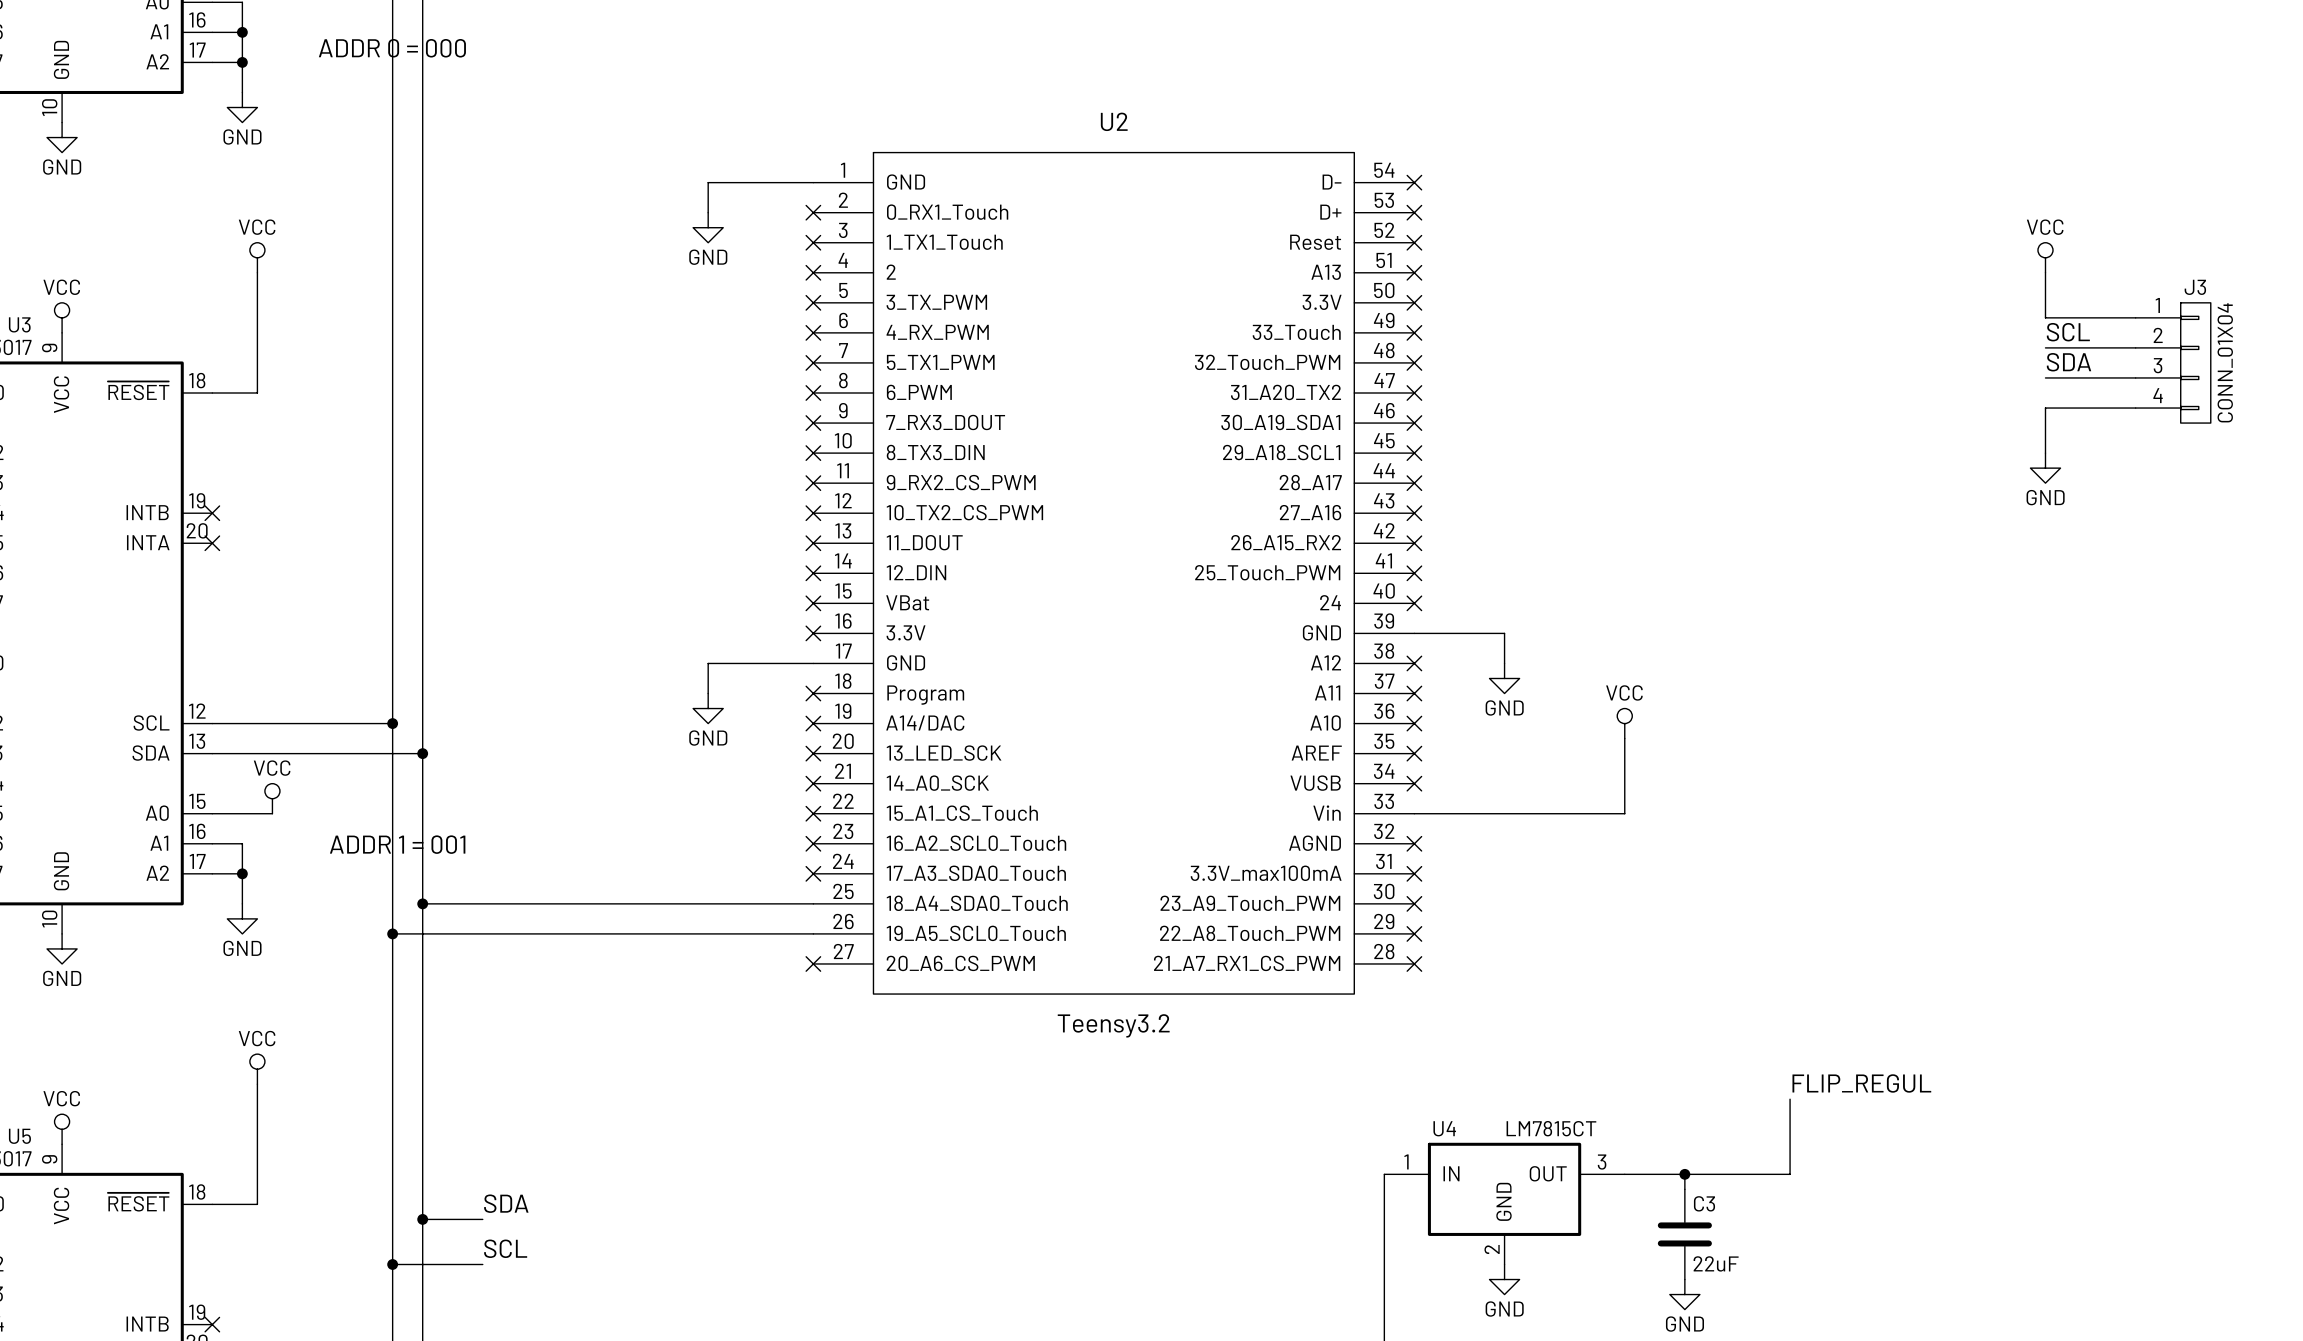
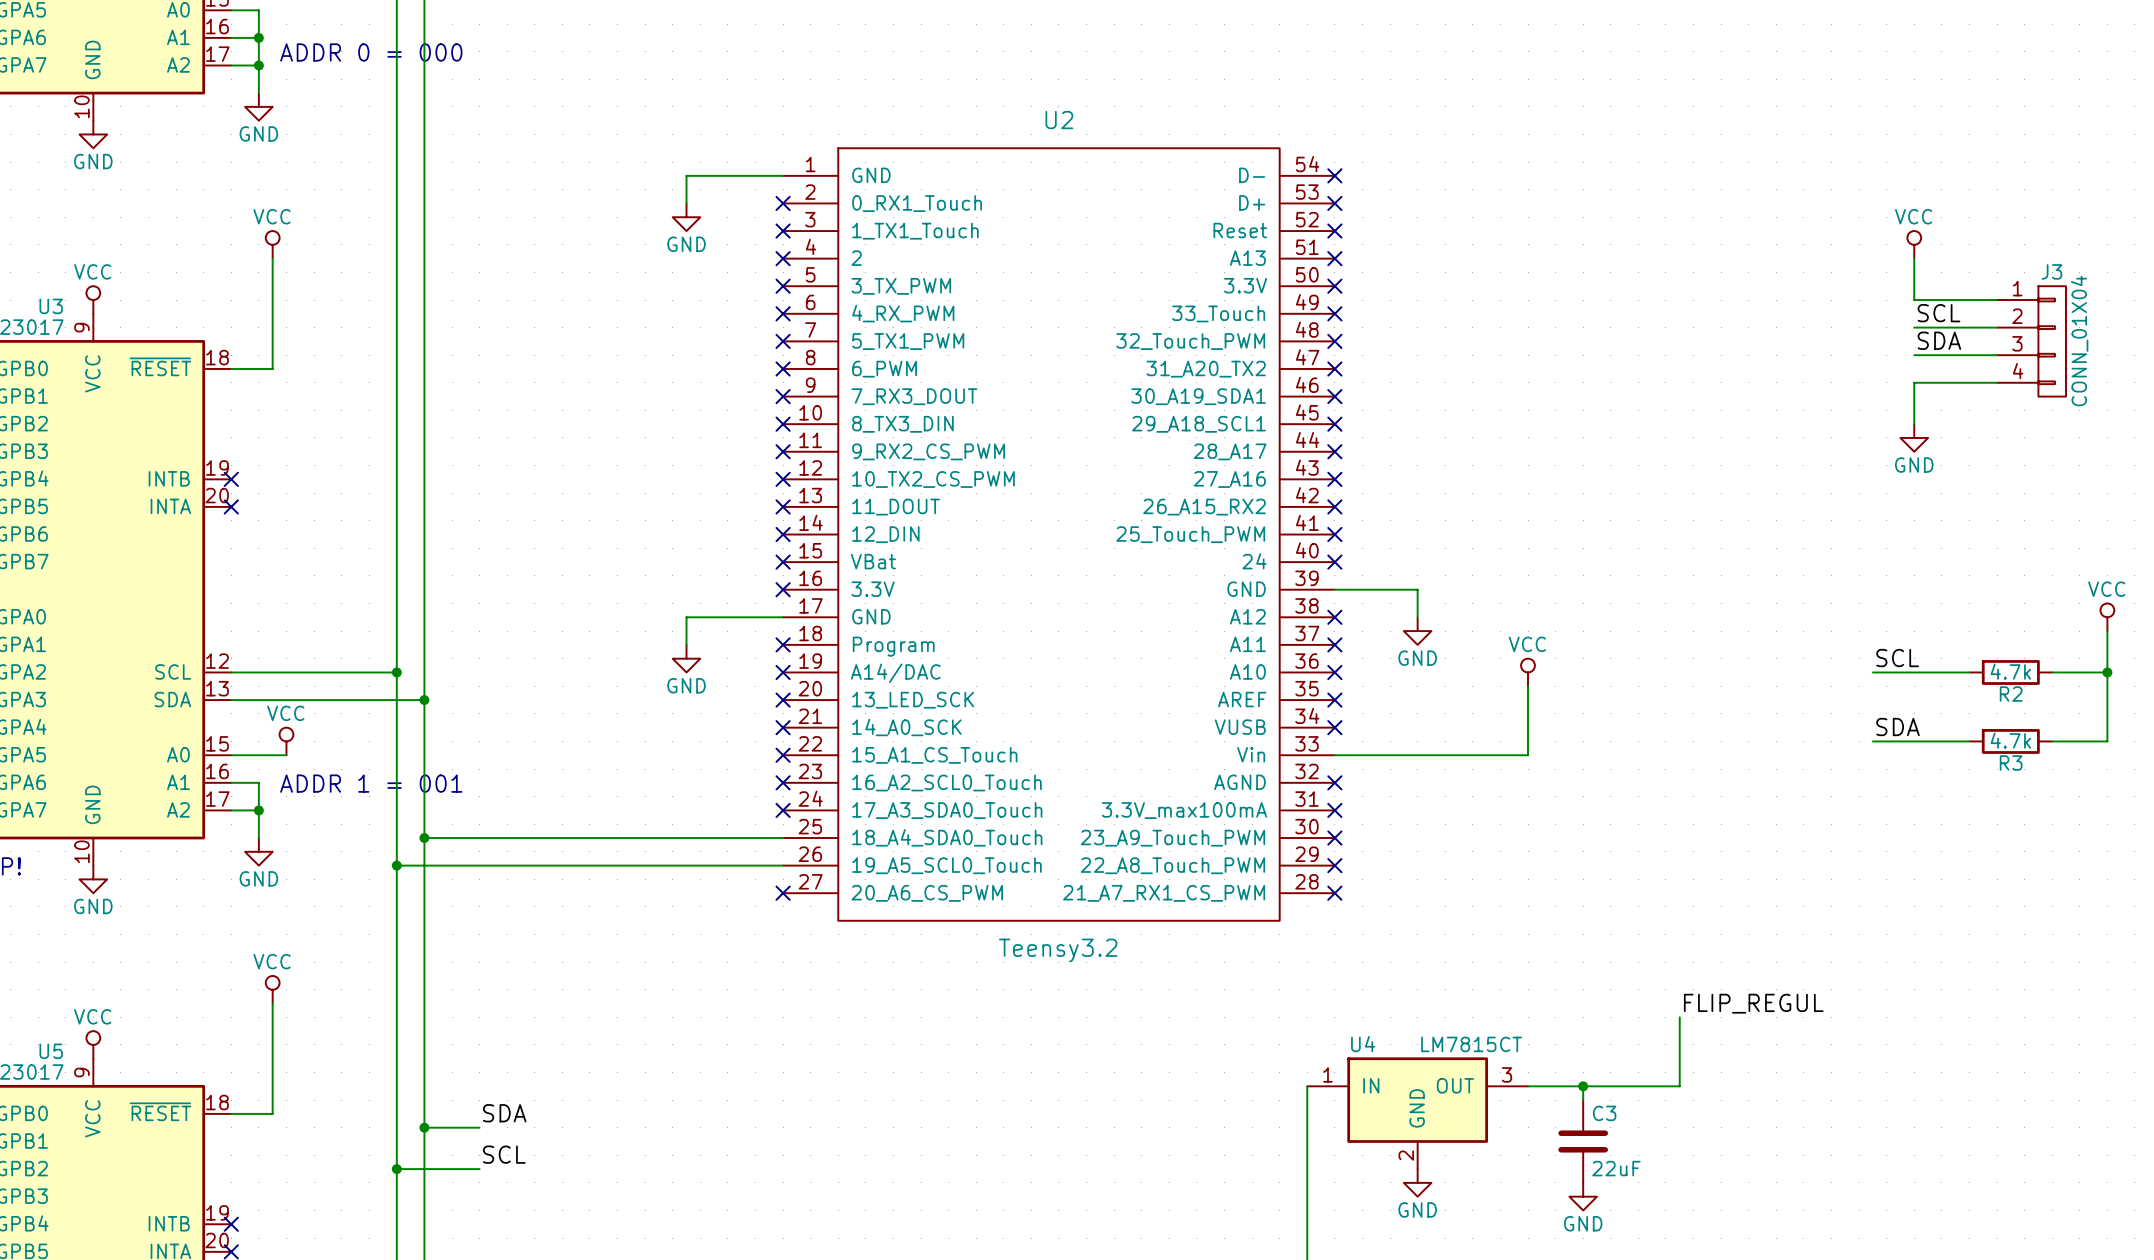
power symbol: none -> VCC (2107, 617)
wire: none -> (2107, 631) (2107, 741) (2052, 741)
label: none -> SCL (1897, 658)
wire: none -> (1872, 672) (1969, 672)
R2: none -> 4.7k (2010, 672)
wire: none -> (2052, 672) (2107, 672)
junction: none -> (2107, 672)
label: none -> SDA (1898, 727)
wire: none -> (1872, 741) (1969, 741)
R3: none -> 4.7k (2010, 741)

